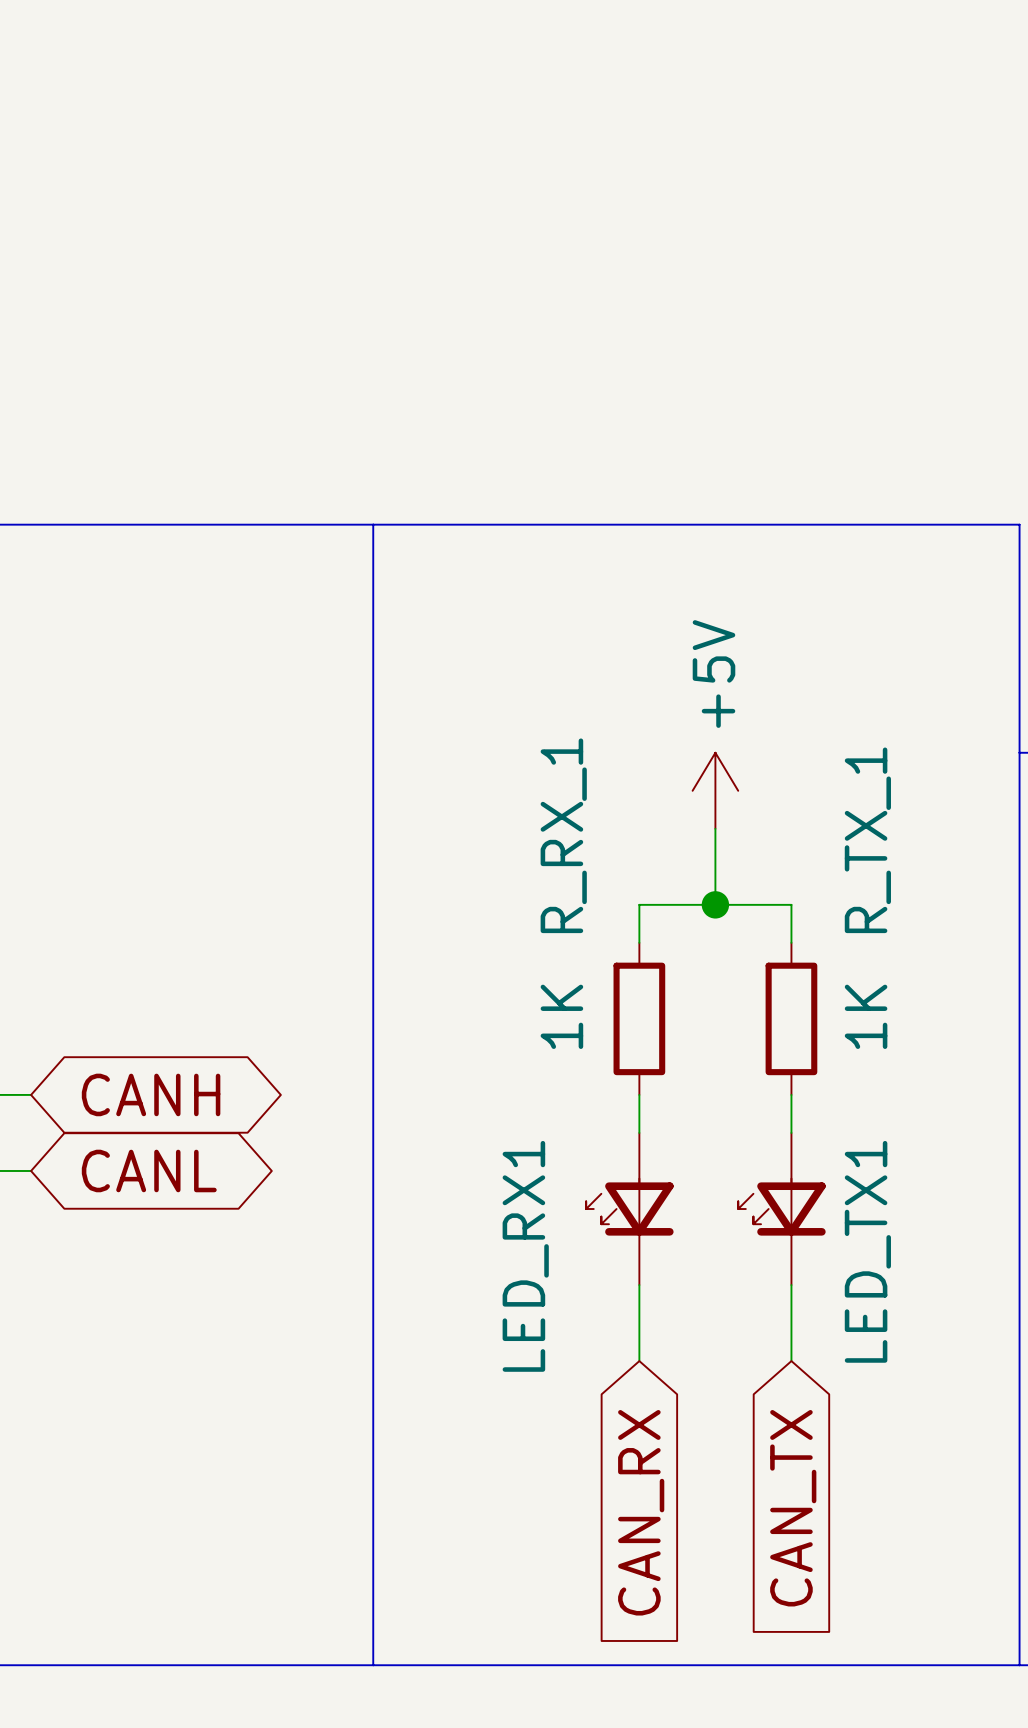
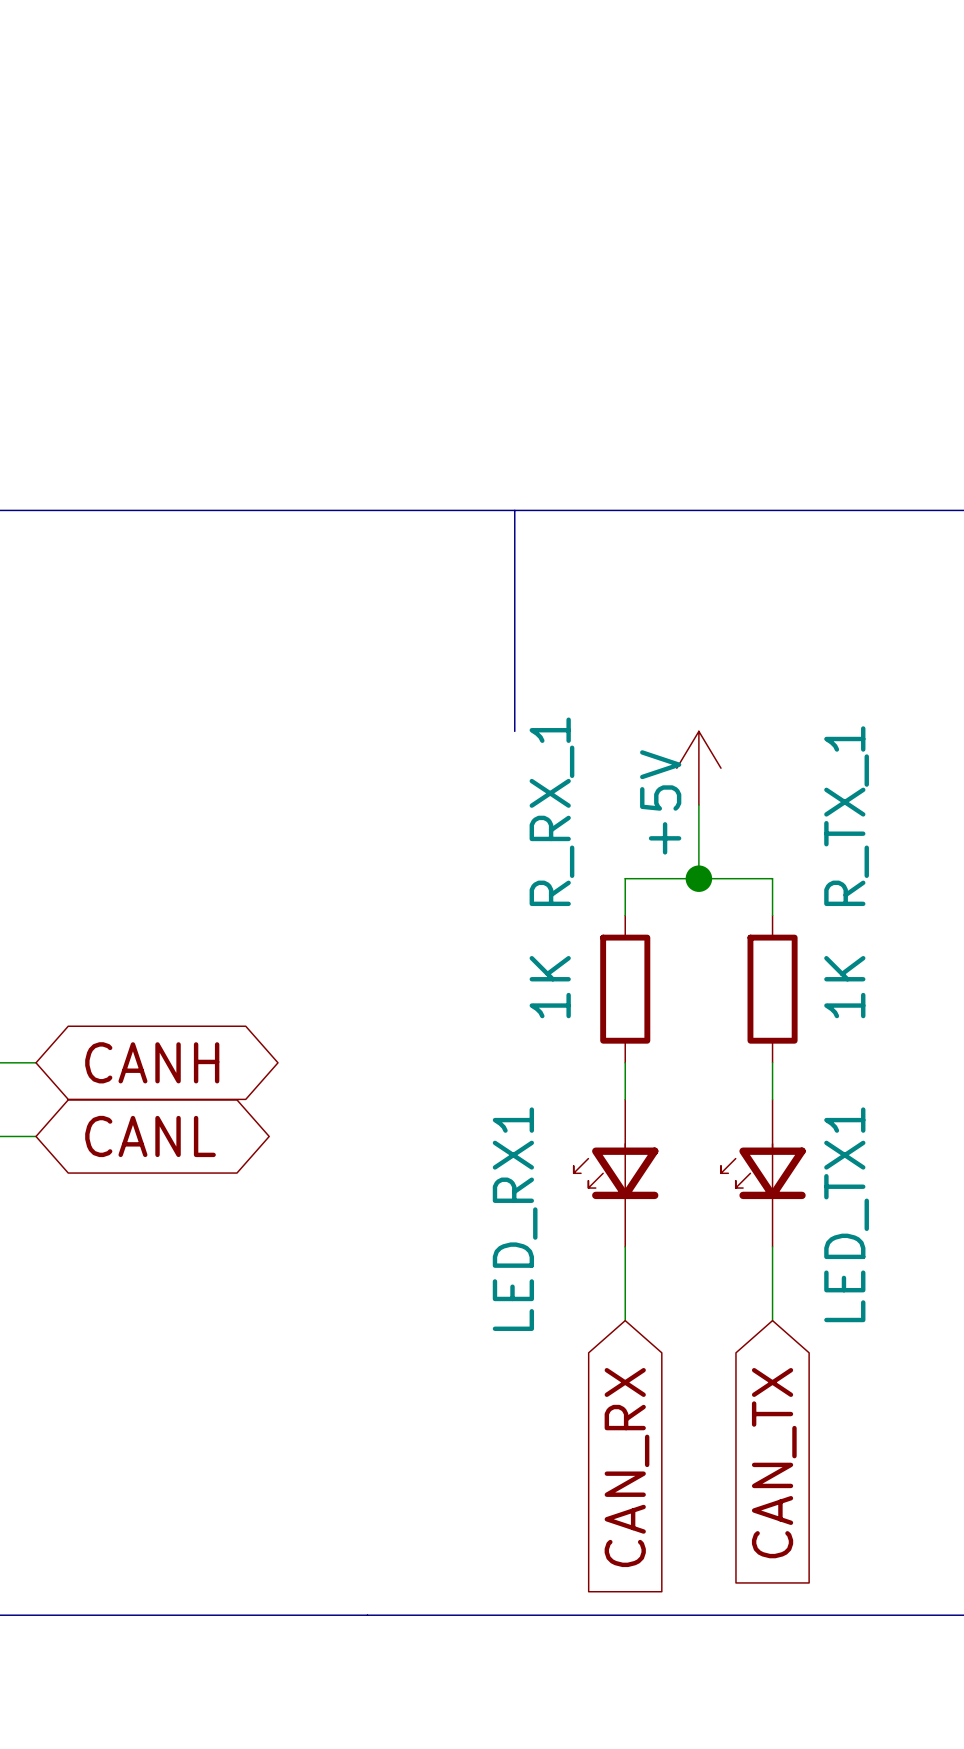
line: (373, 524) (373, 1665) -> none
line: none -> (514, 510) (514, 731)
power symbol text position: +5V (713, 674) -> +5V (660, 802)

